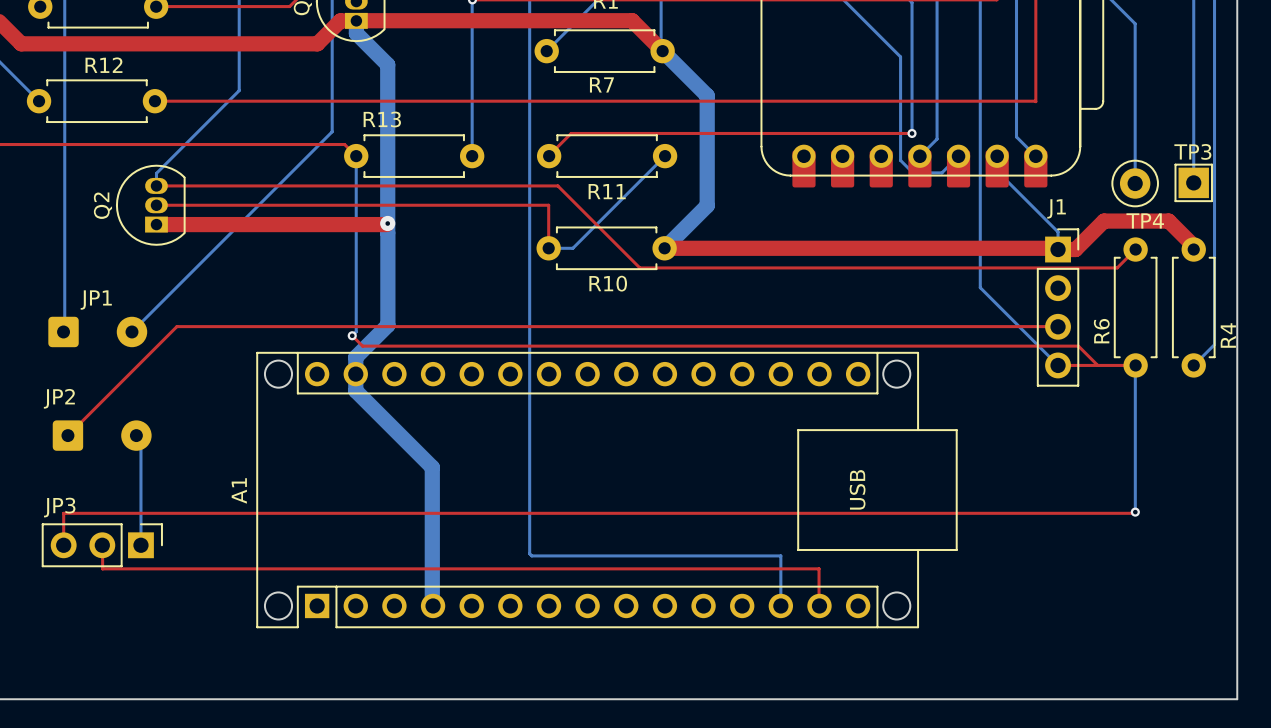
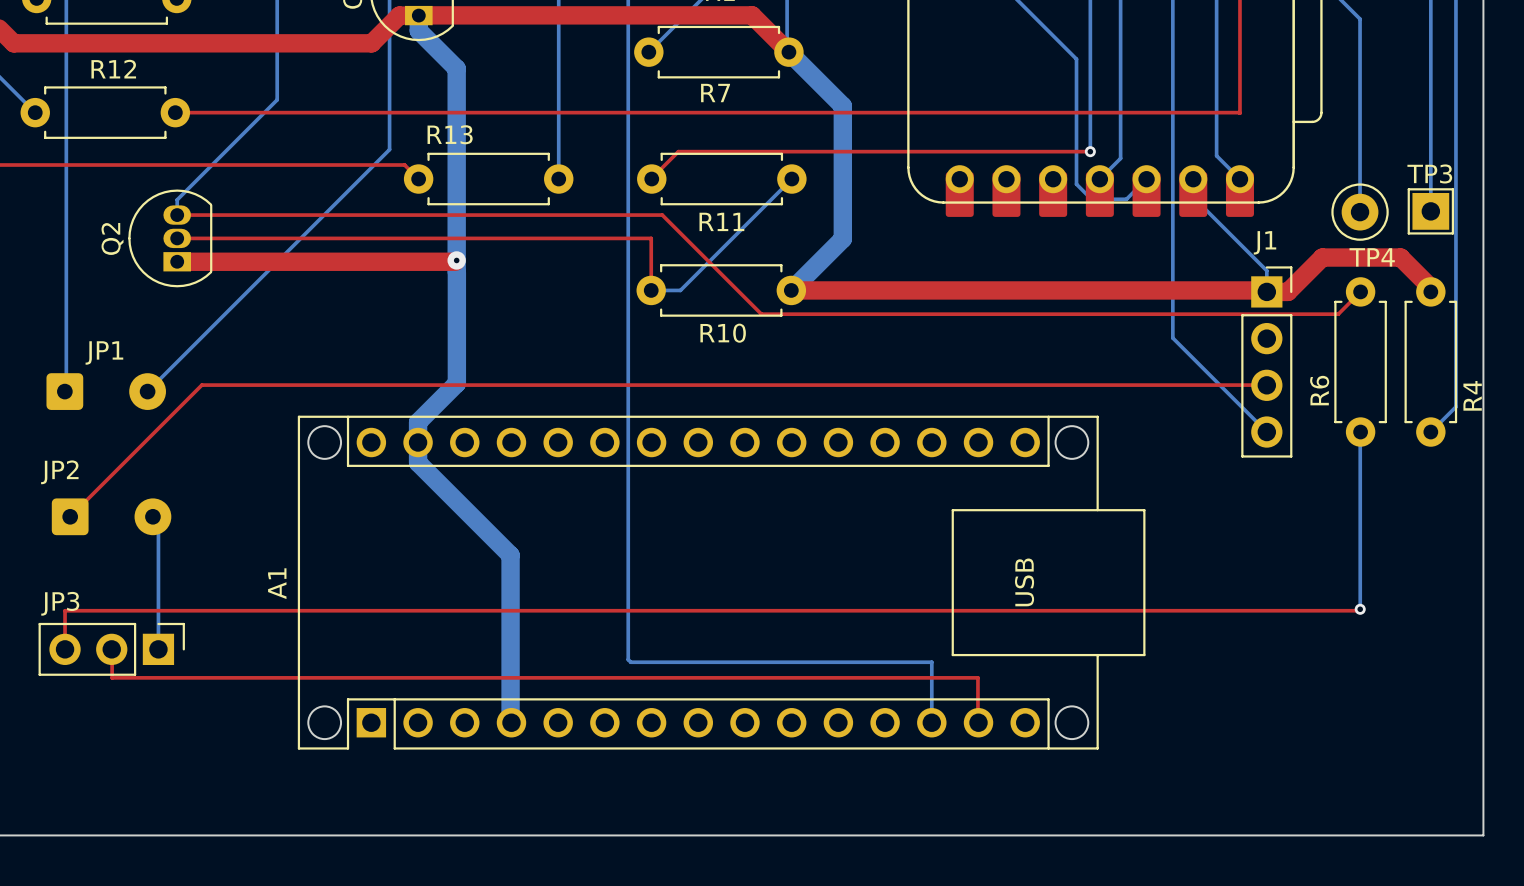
bottom track: (356, 156) (356, 331) (352, 335) -> none
top track: (352, 335) (362, 346) (1078, 346) (1097, 365) -> none
via: (352, 335) -> none
top track: (1058, 365) (1135, 365) -> none

